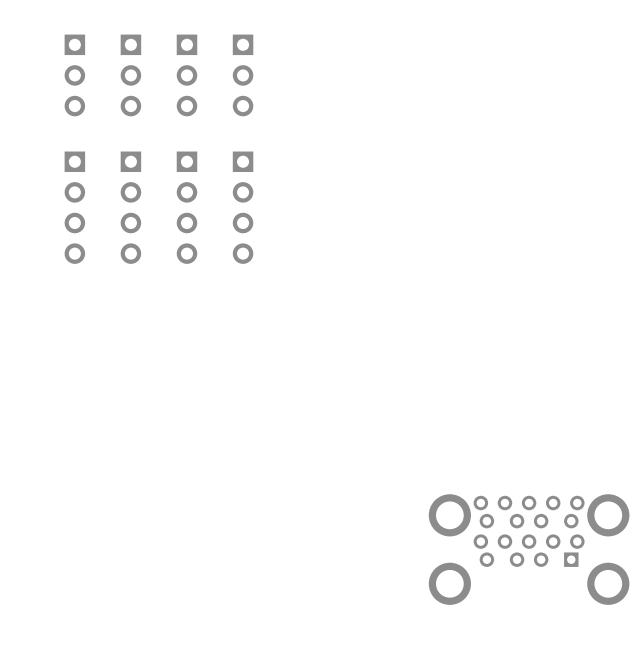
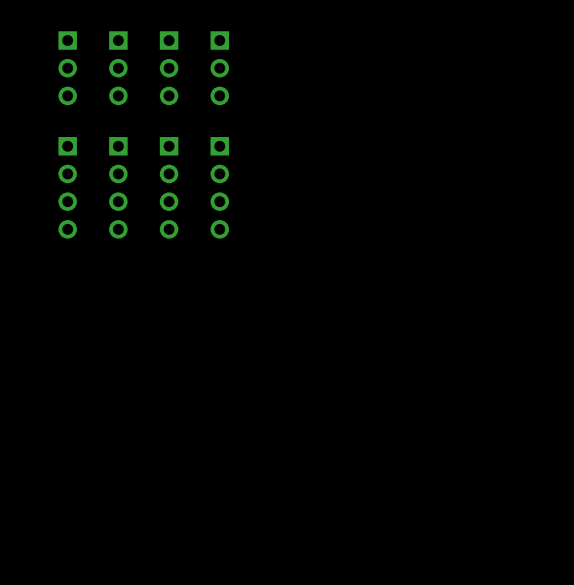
part: (529, 549) -> none

